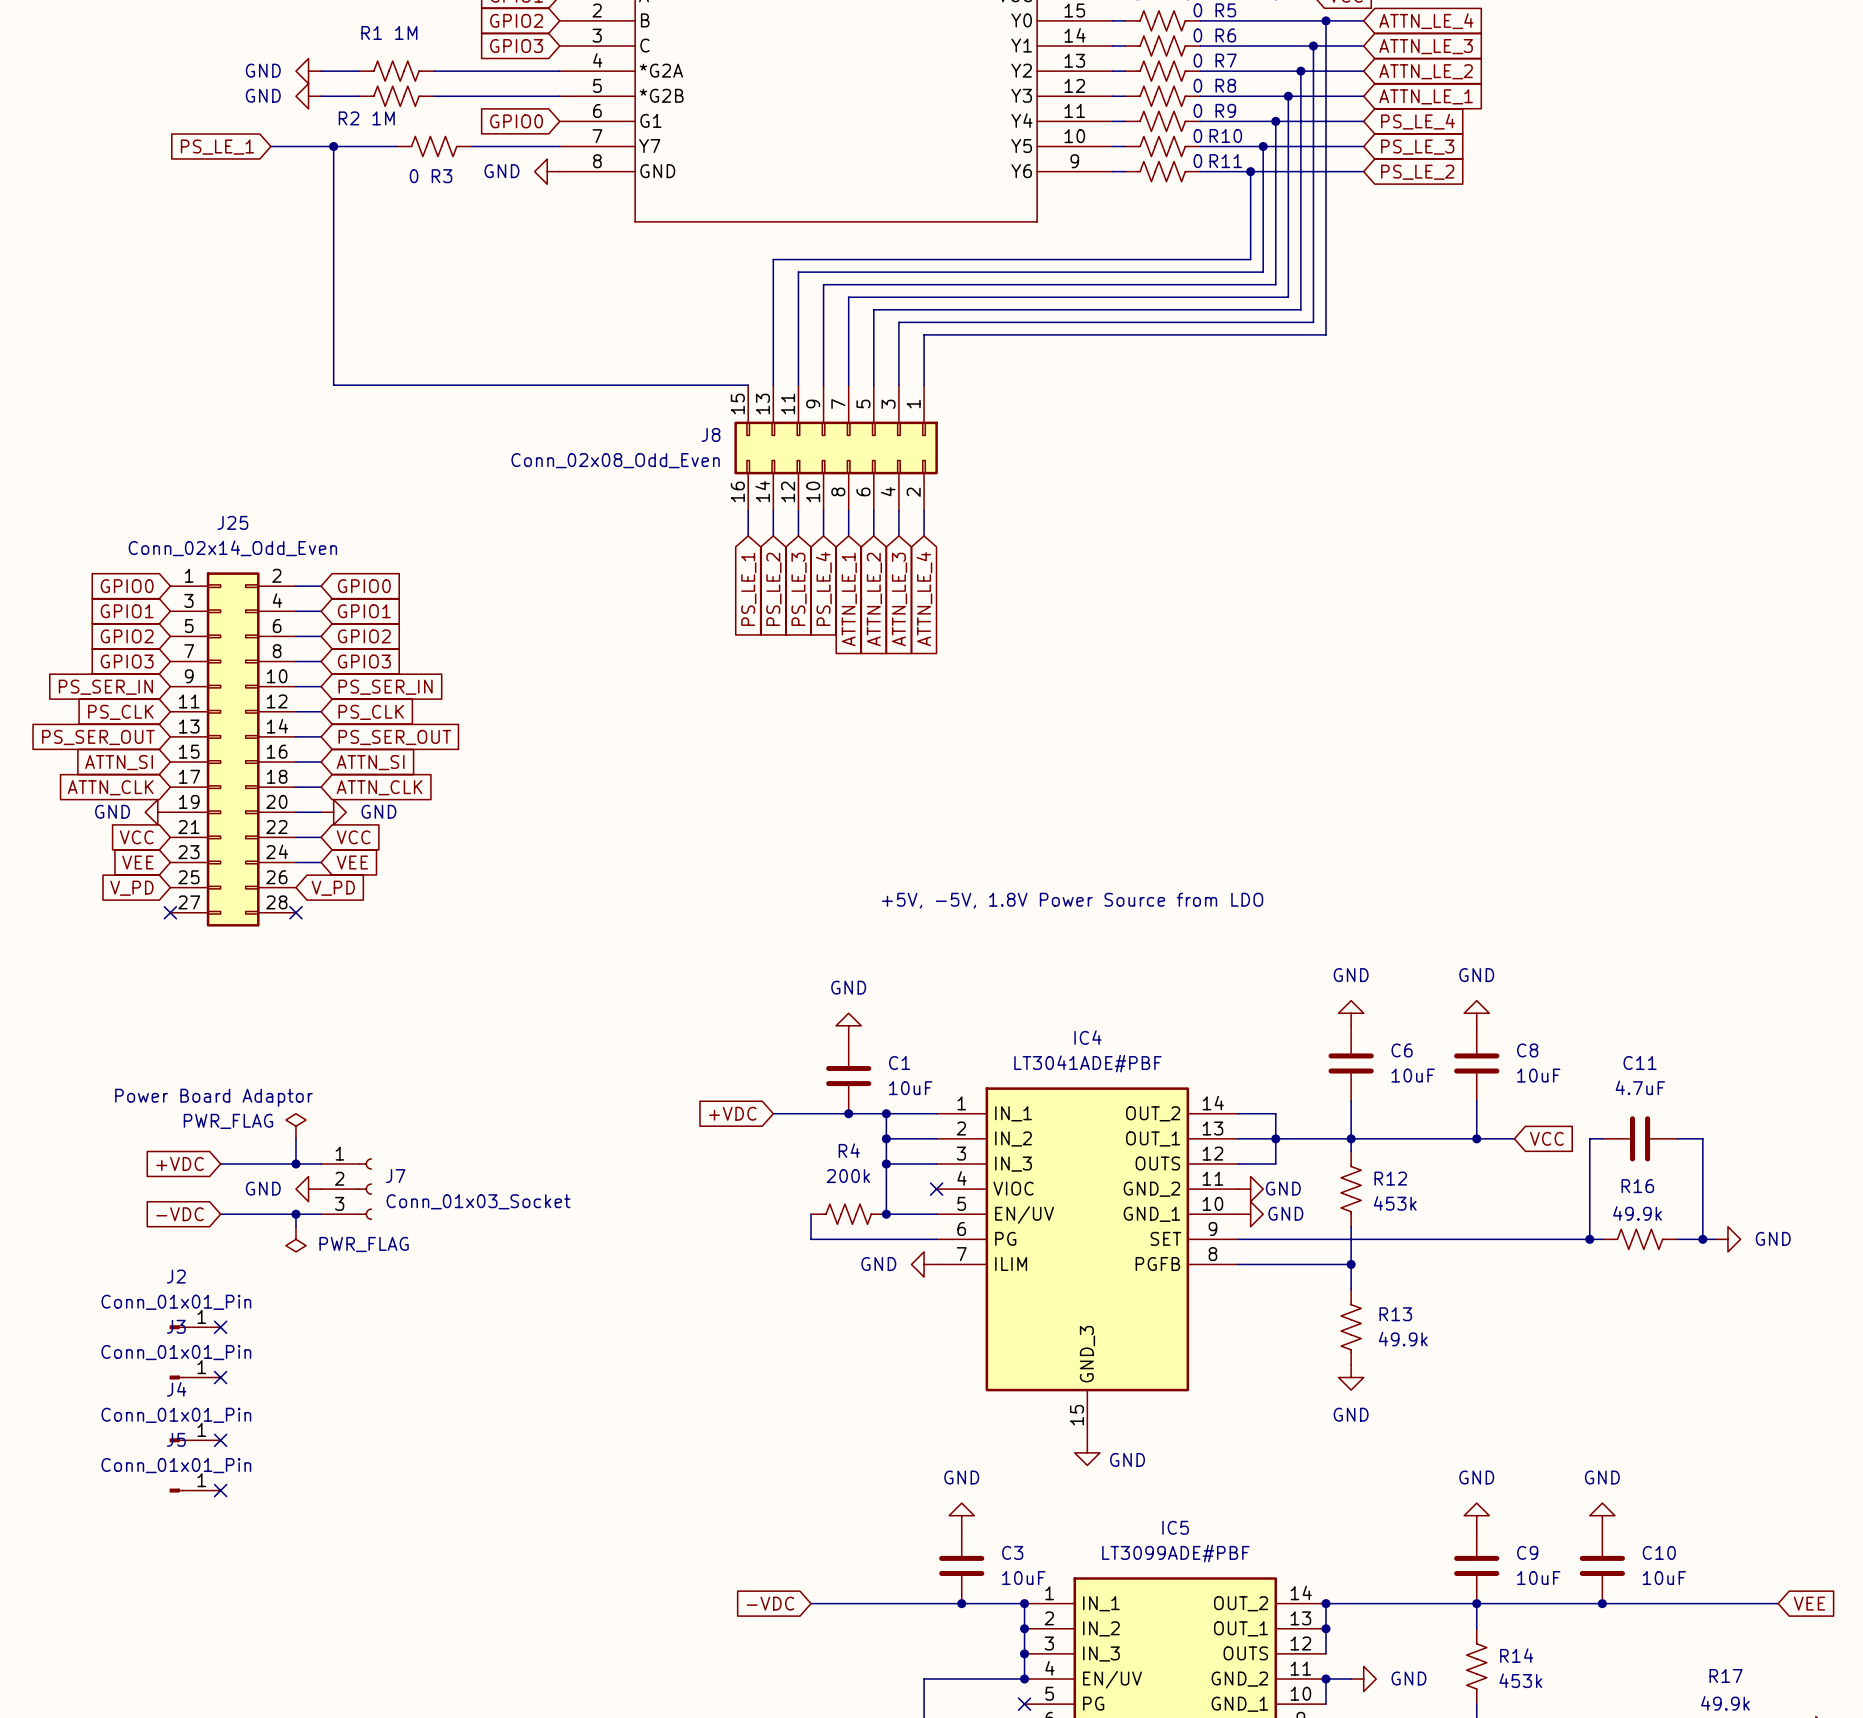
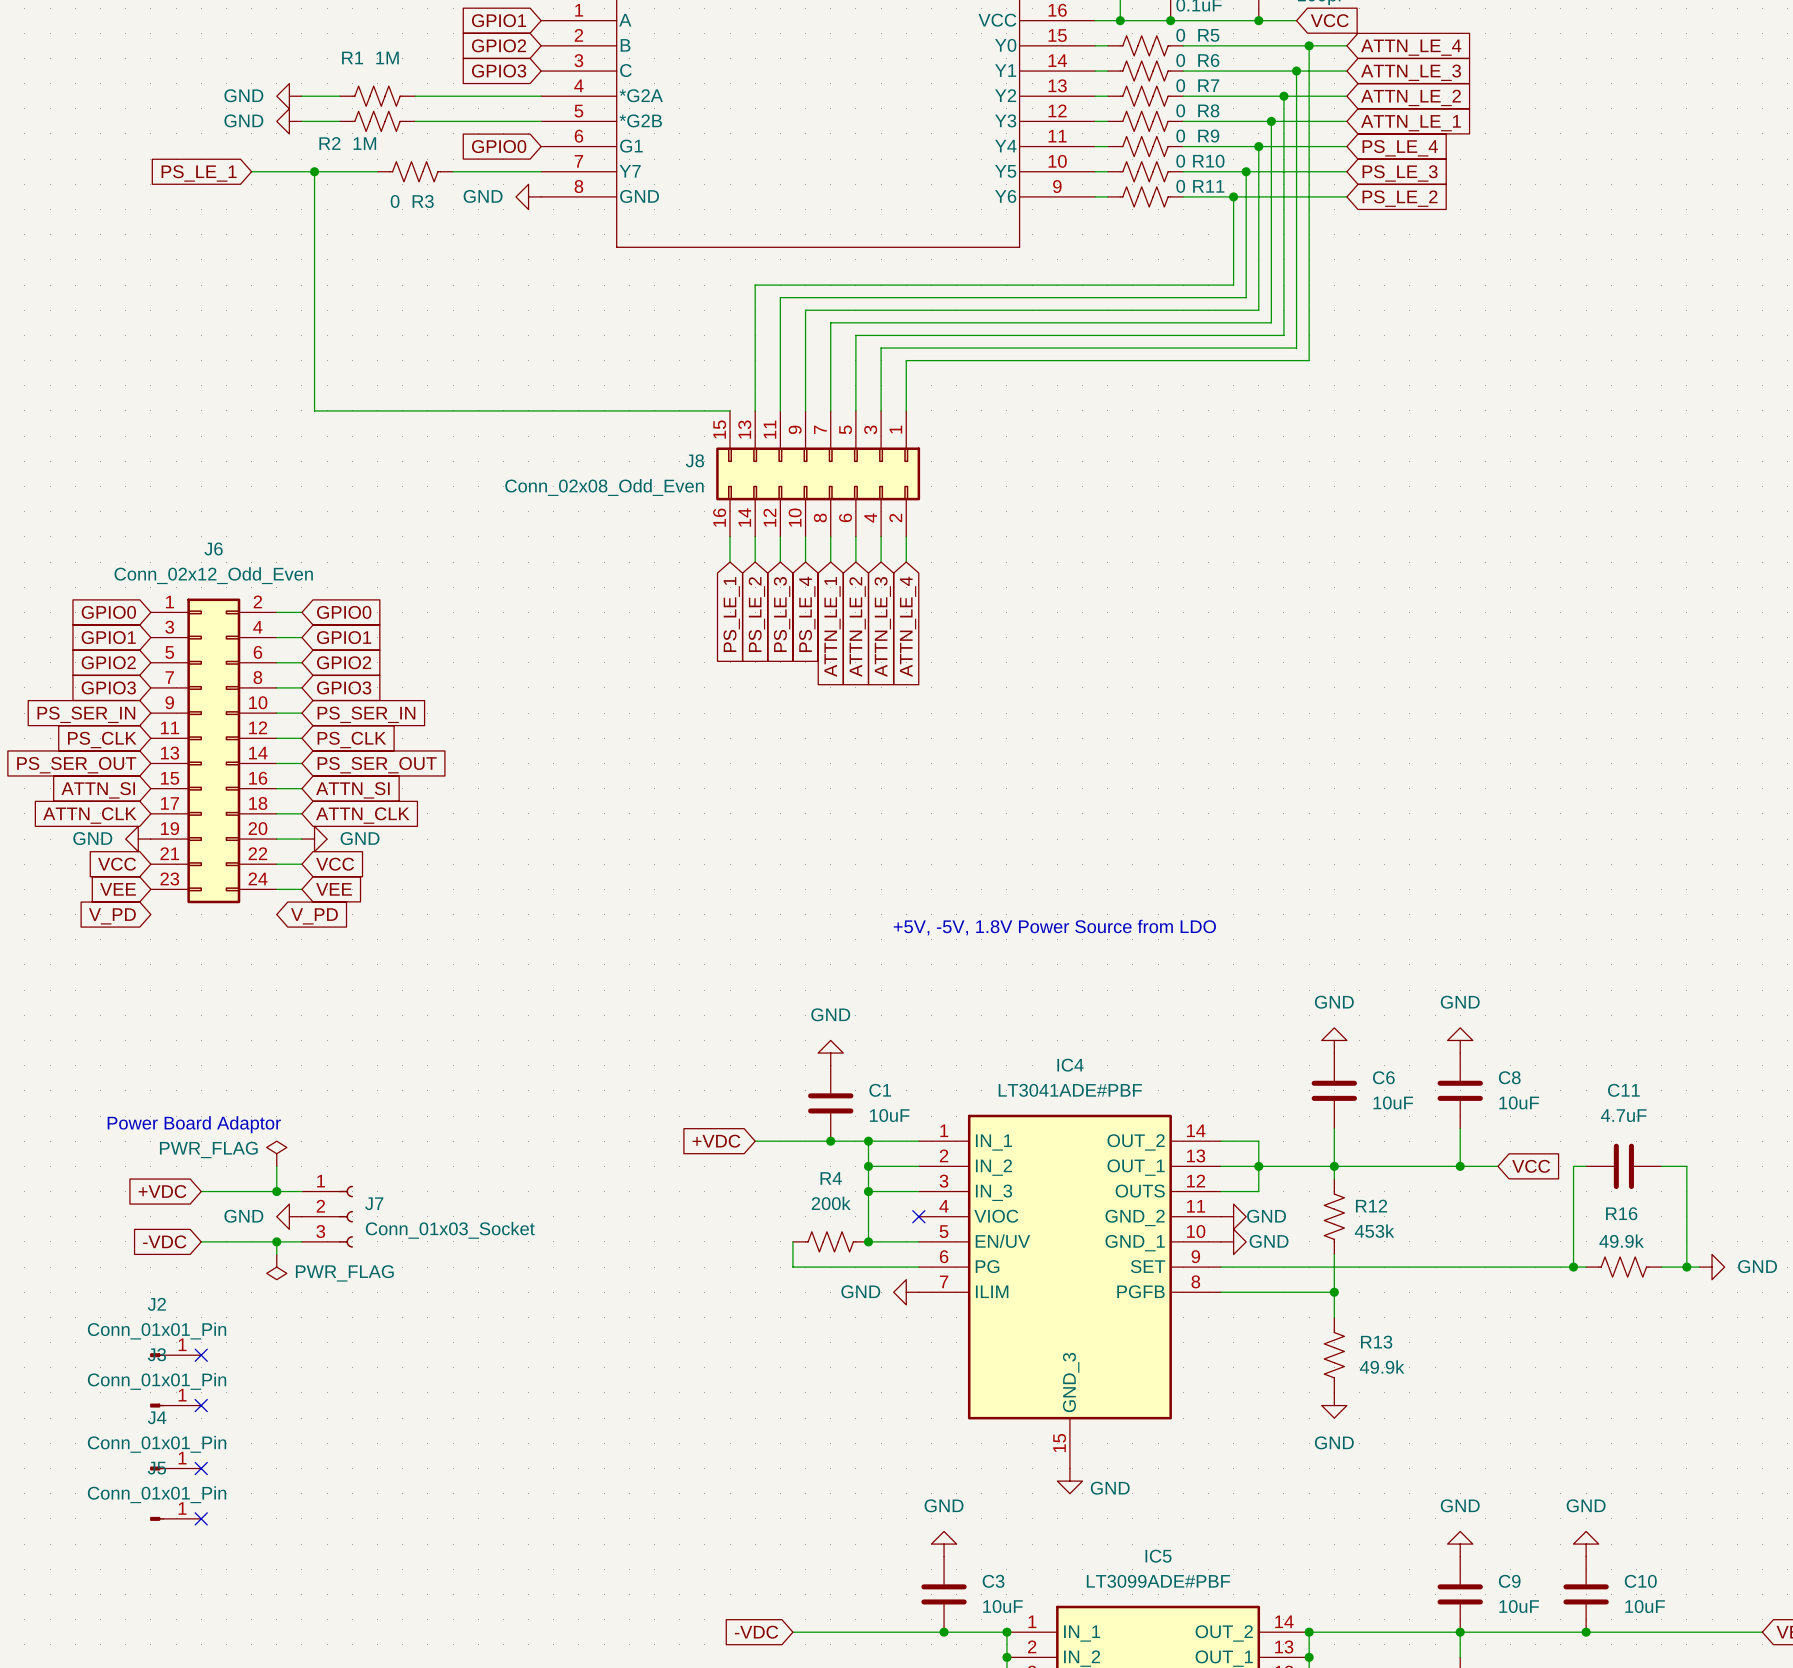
J6: none -> Conn_02x12_Odd_Even (213, 750)
J25: Conn_02x14_Odd_Even (233, 749) -> none
no-connect mark: (170, 912) -> none
no-connect mark: (295, 912) -> none

